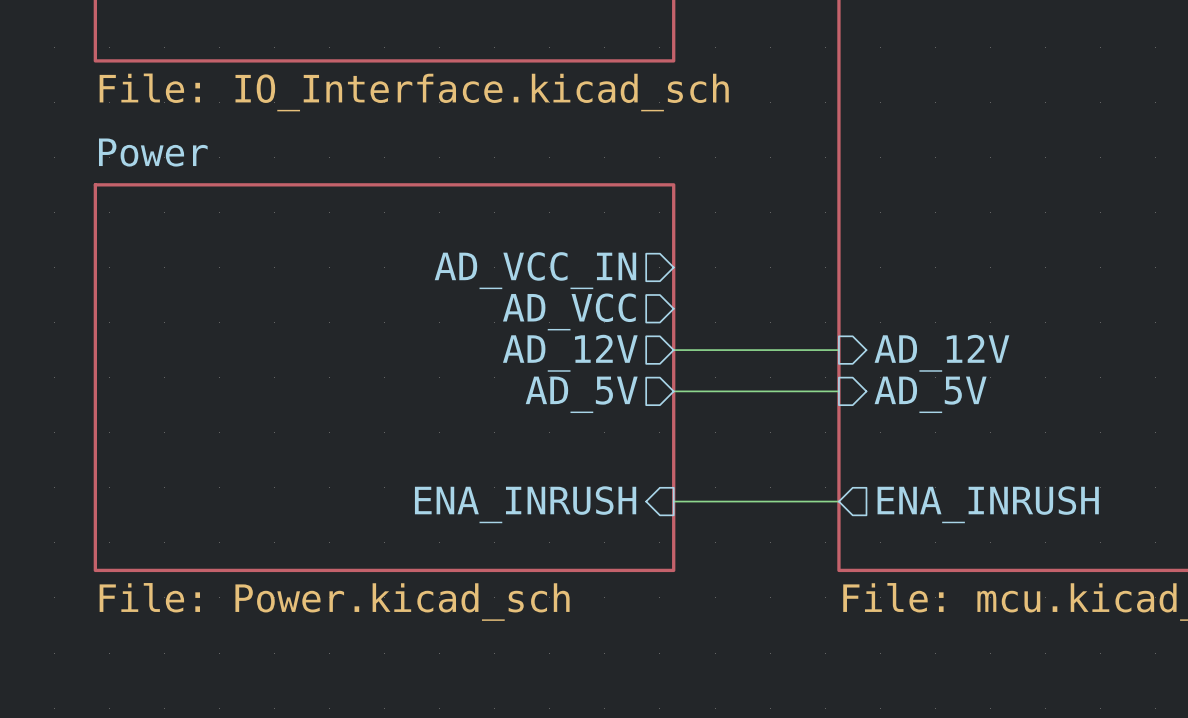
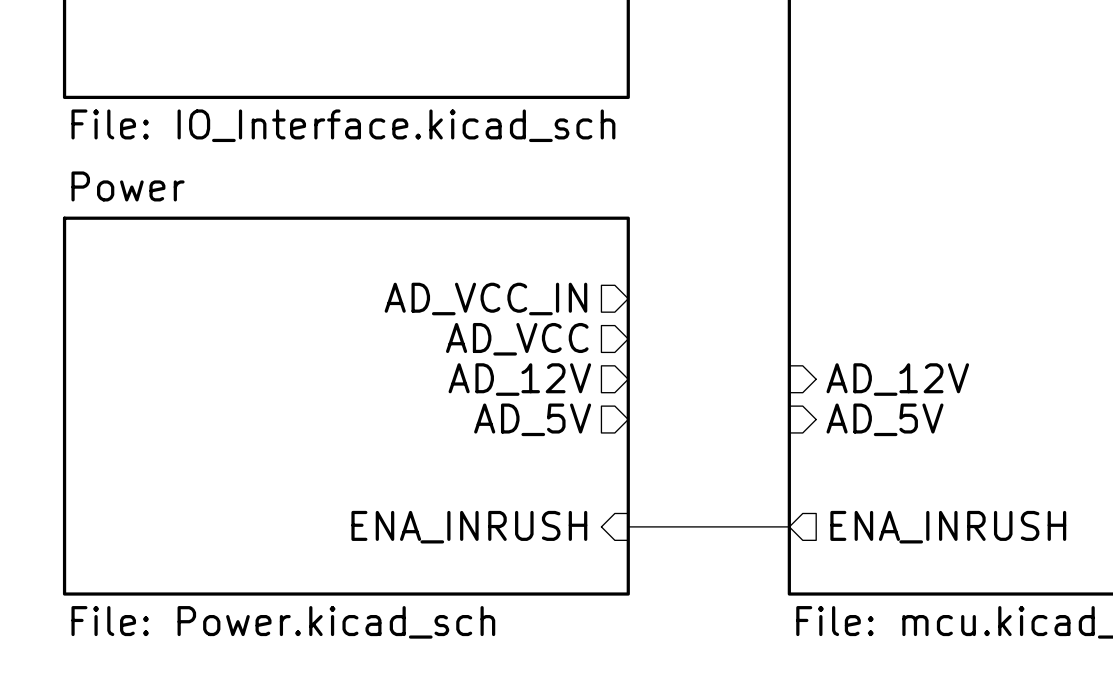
wire: (673, 350) (838, 350) -> none
wire: (673, 391) (838, 391) -> none

